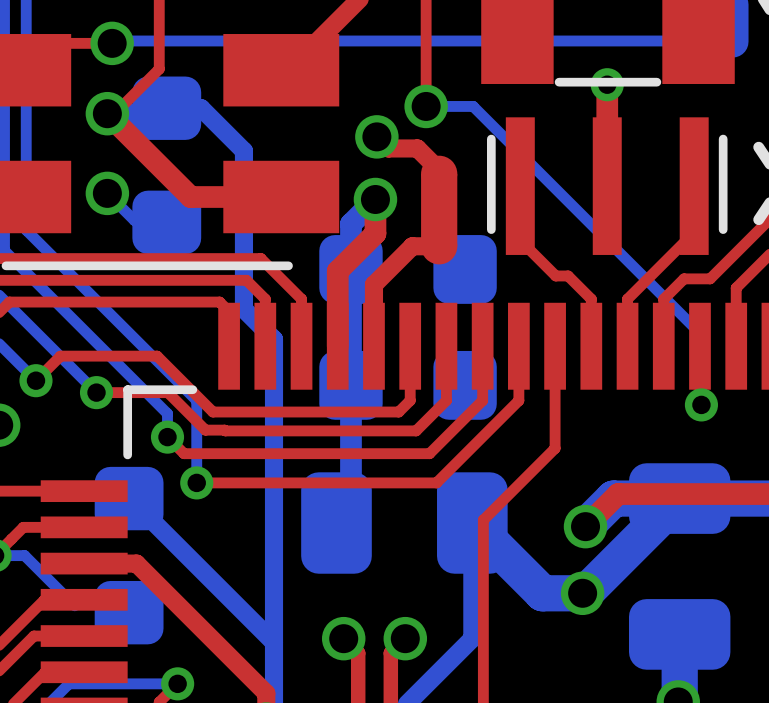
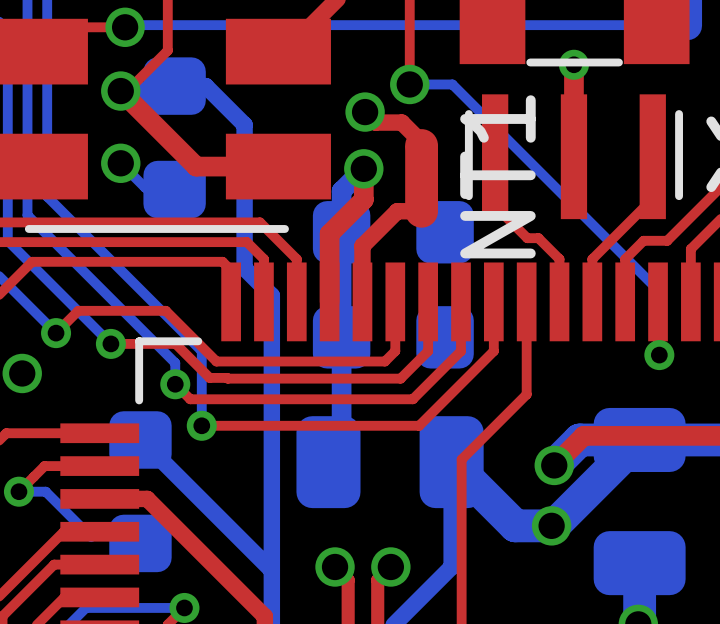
NT1 name: none -> NT1 (497, 176)

